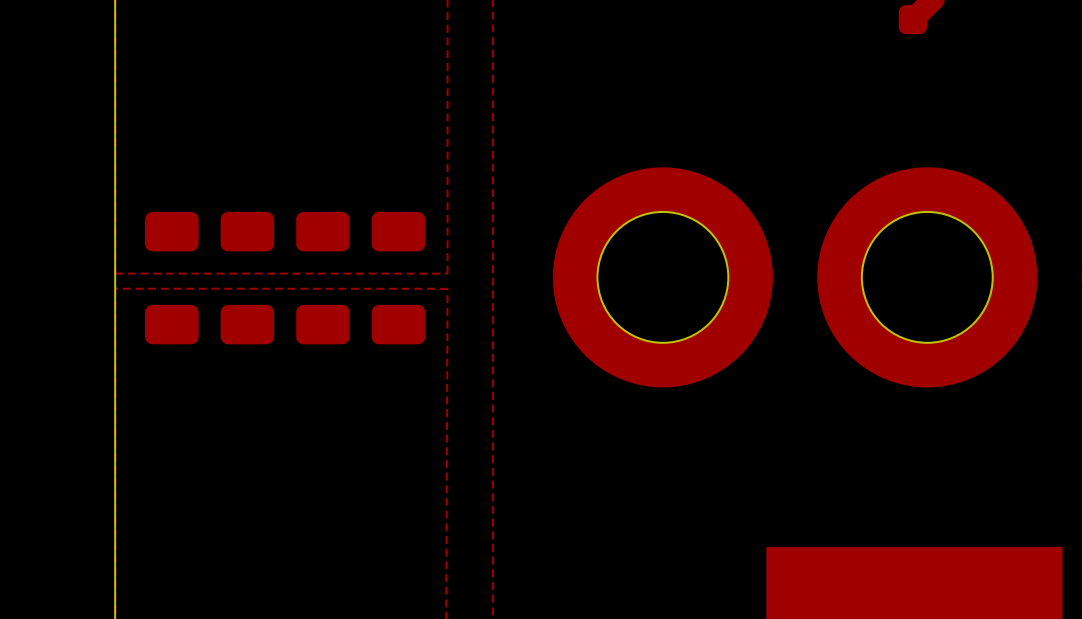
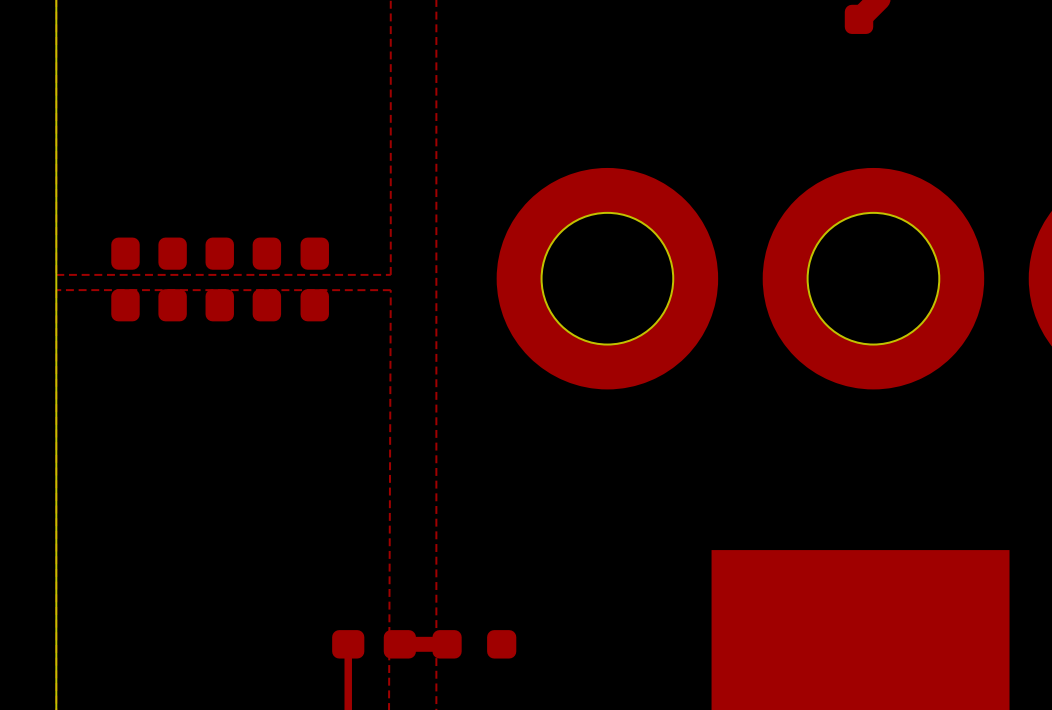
part footprint: [145, 211, 199, 345] -> [111, 237, 140, 322]
part footprint: [296, 211, 350, 345] -> [252, 237, 282, 322]
part: none -> (172, 279)
part: (247, 278) -> none
part: none -> (219, 279)
part: none -> (314, 279)
part: (398, 278) -> none

